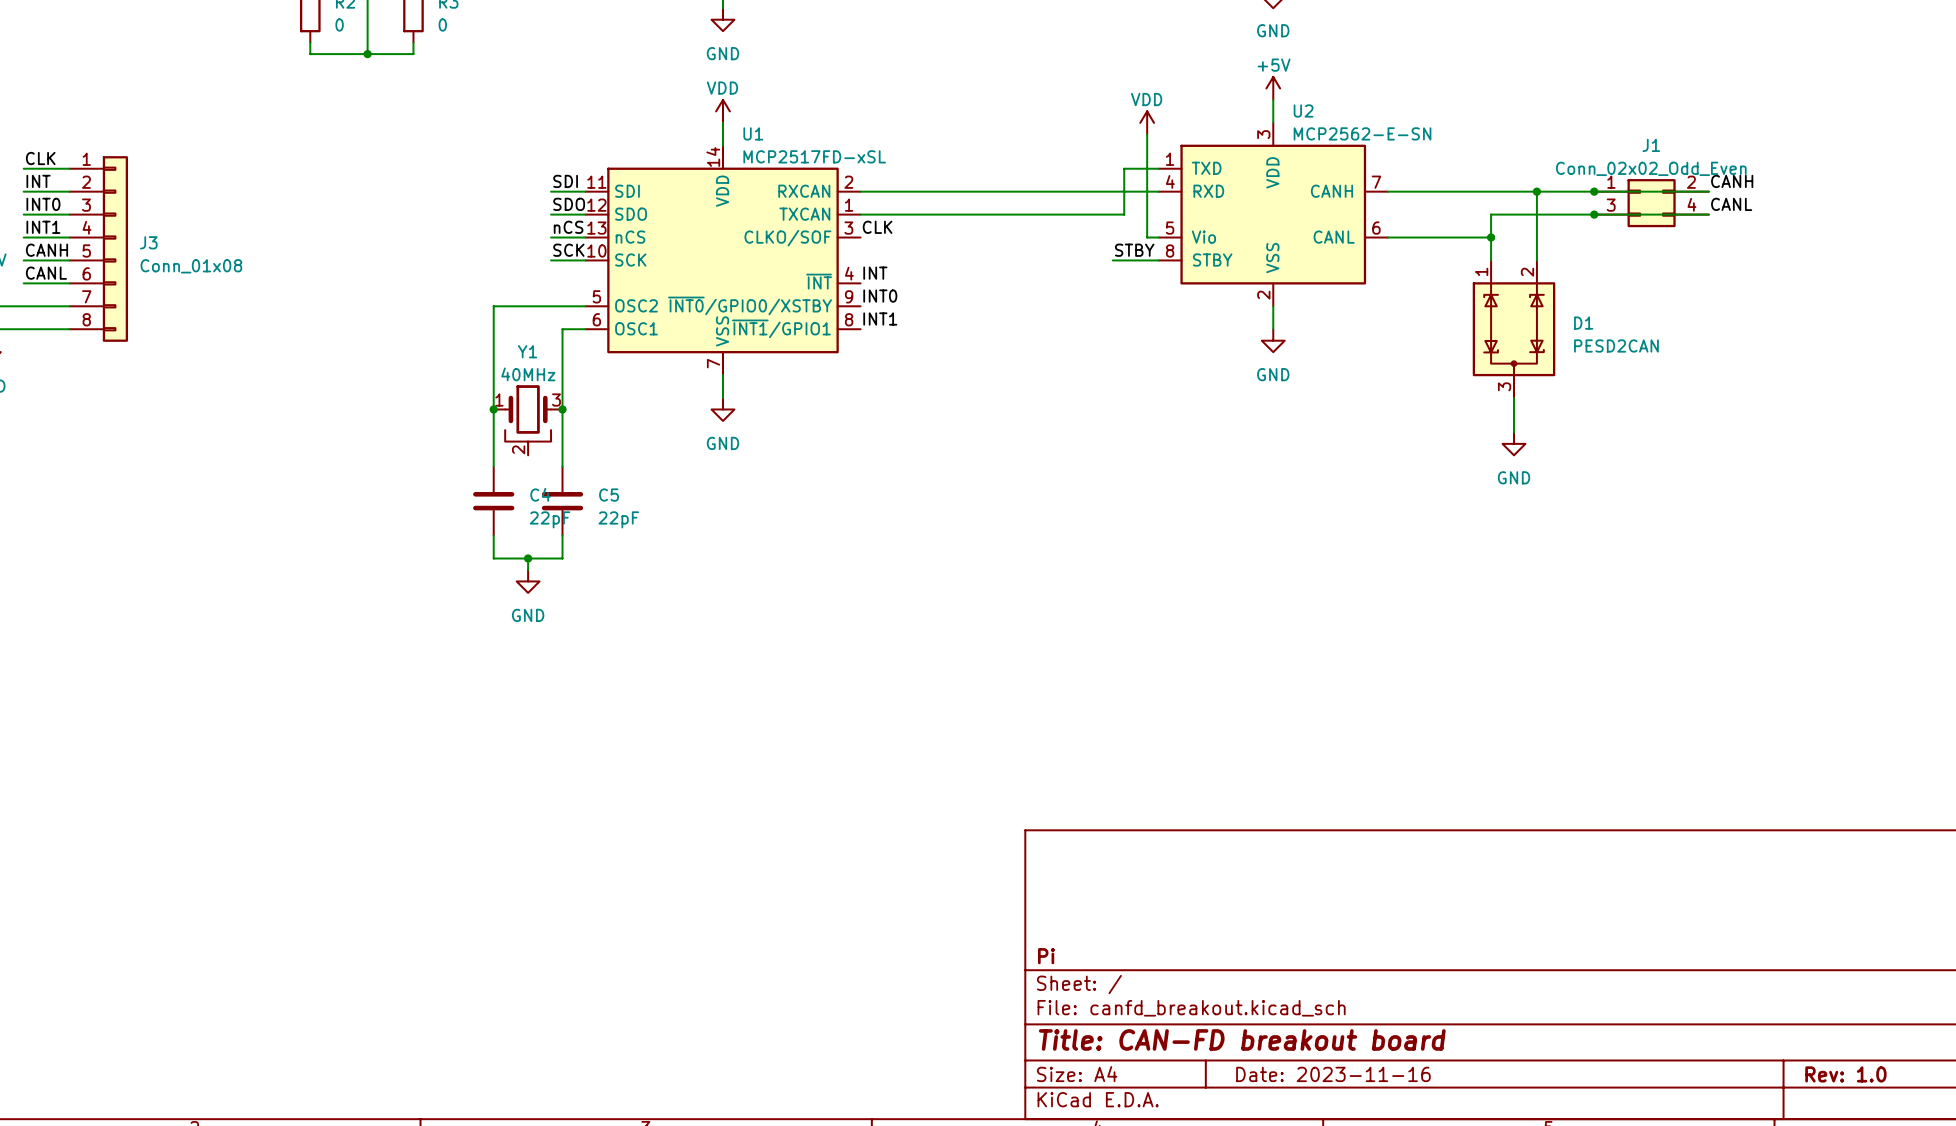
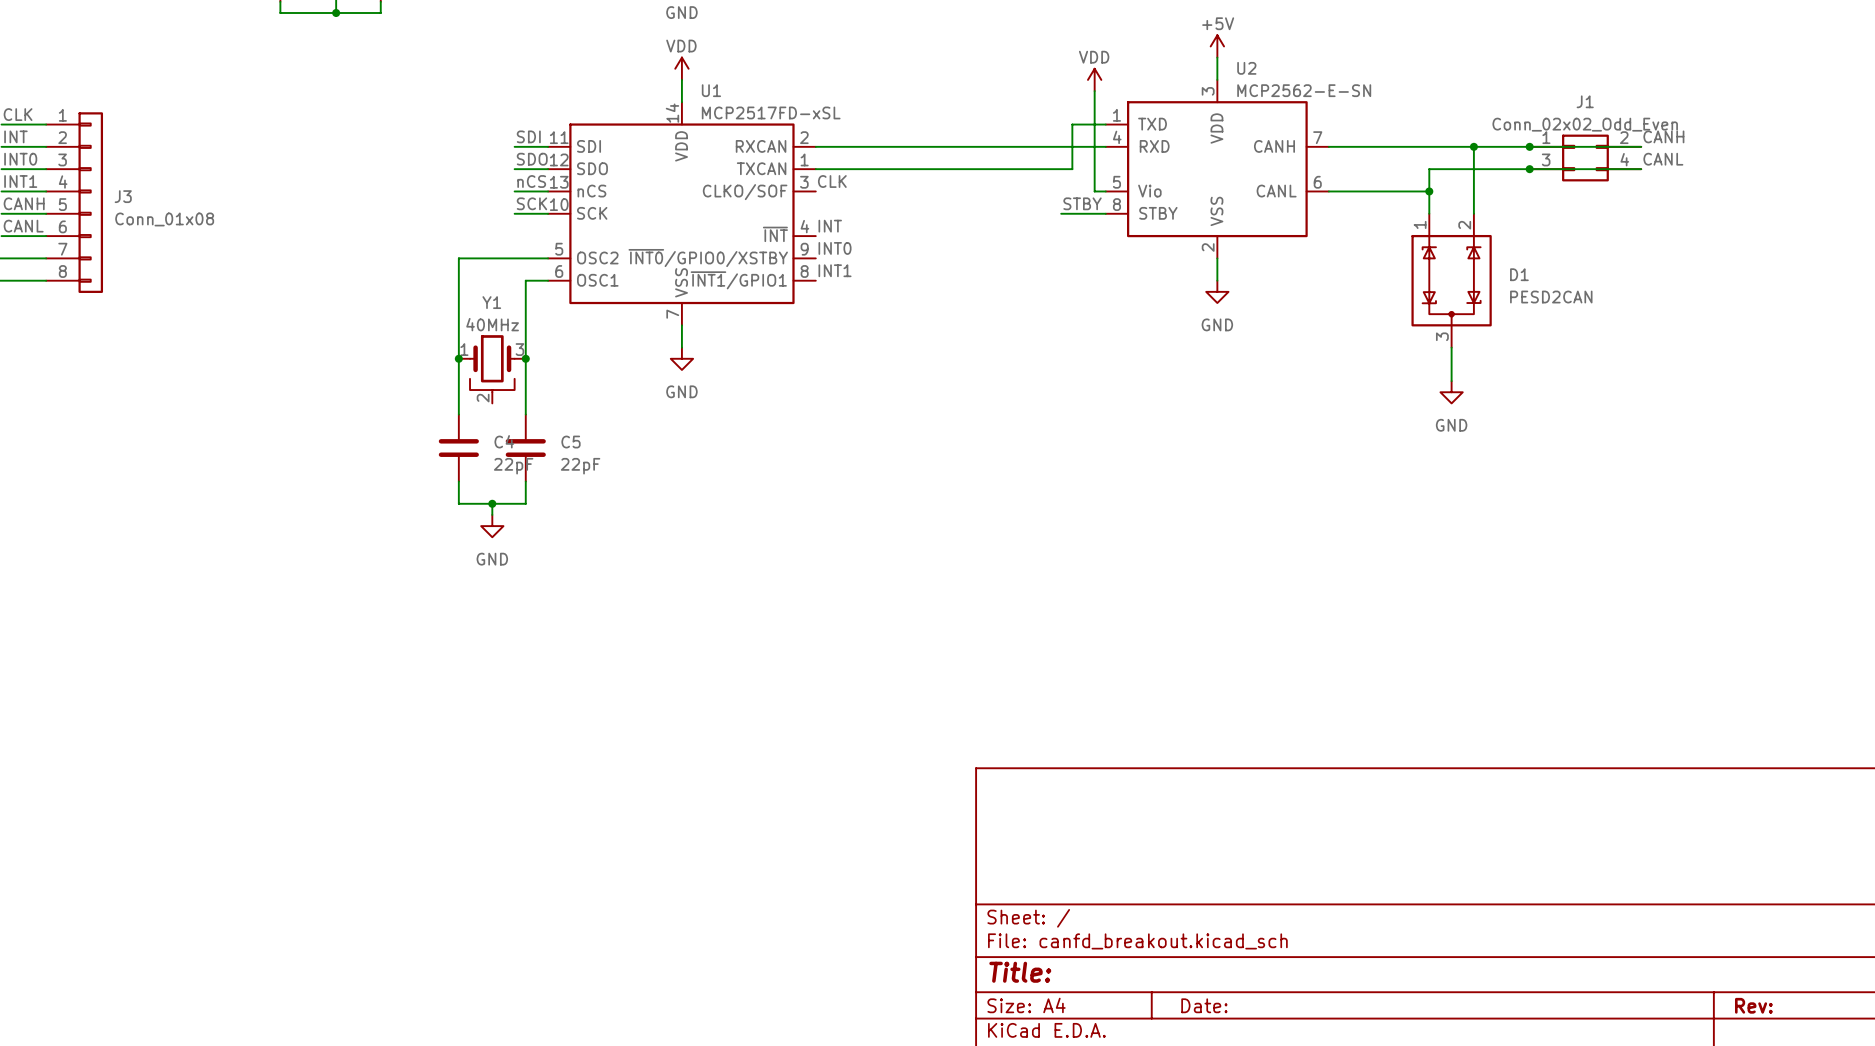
title block: Pi (1046, 956) -> none
title block: Title: CAN-FD breakout board (1242, 1039) -> Title: (1020, 972)
title block: Date: 2023-11-16 (1333, 1074) -> Date: (1204, 1005)
title block: Rev: 1.0 (1845, 1074) -> Rev: (1753, 1005)

